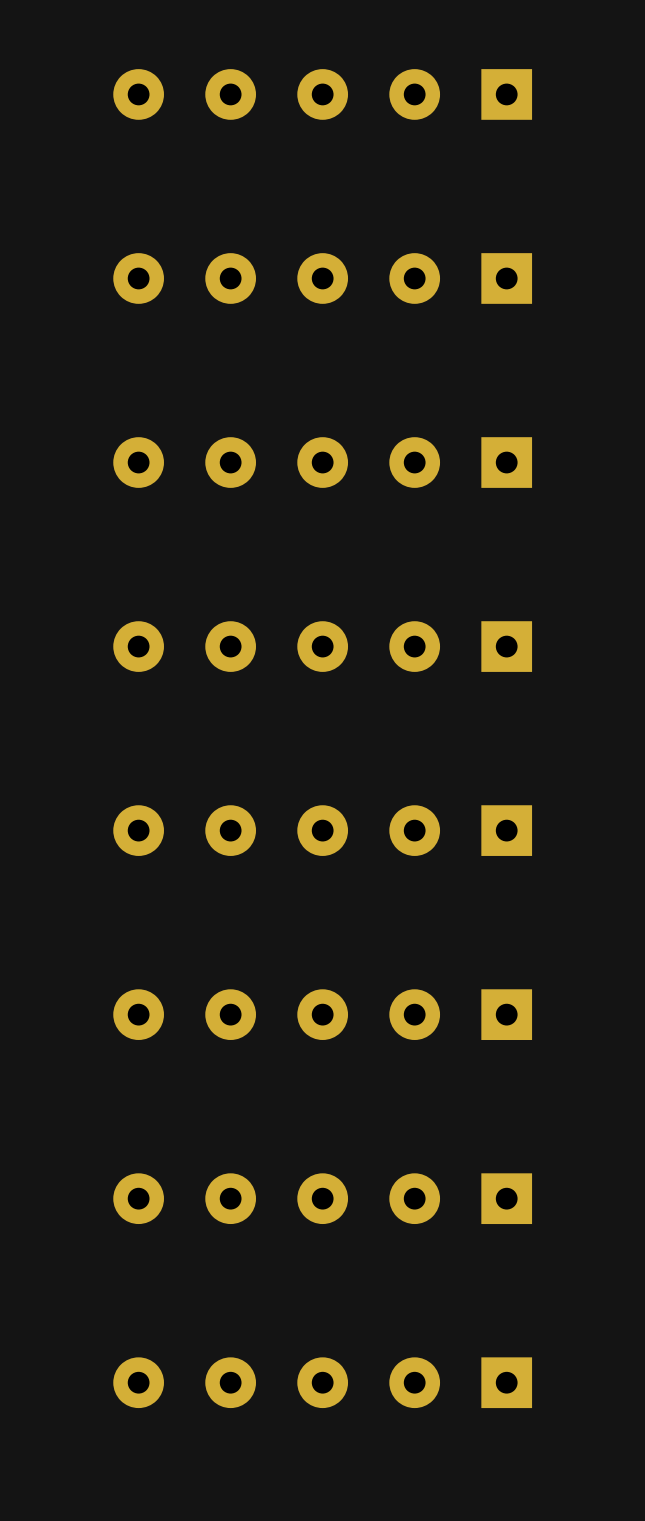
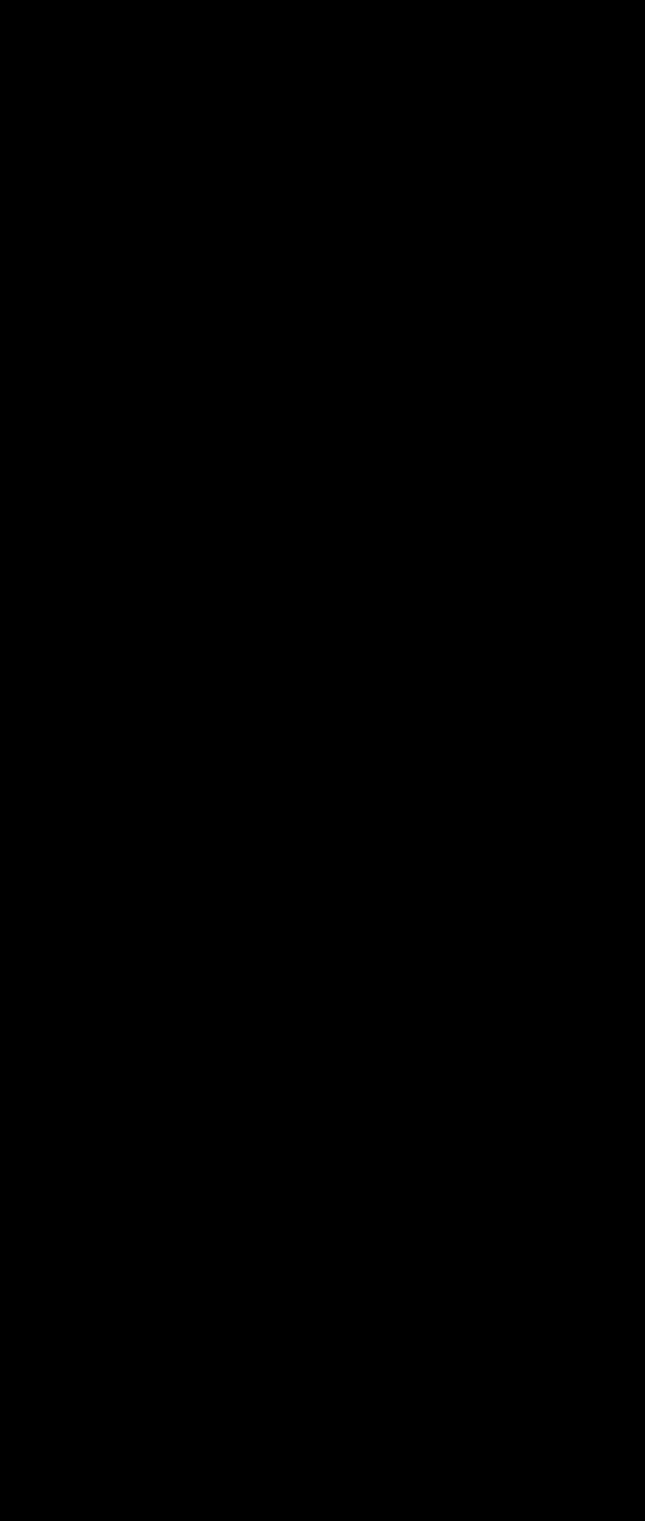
part: (322, 94) -> none
part: (322, 278) -> none
part: (322, 462) -> none
part: (322, 646) -> none
part: (322, 830) -> none
part: (322, 1014) -> none
part: (322, 1198) -> none
part: (322, 1382) -> none

